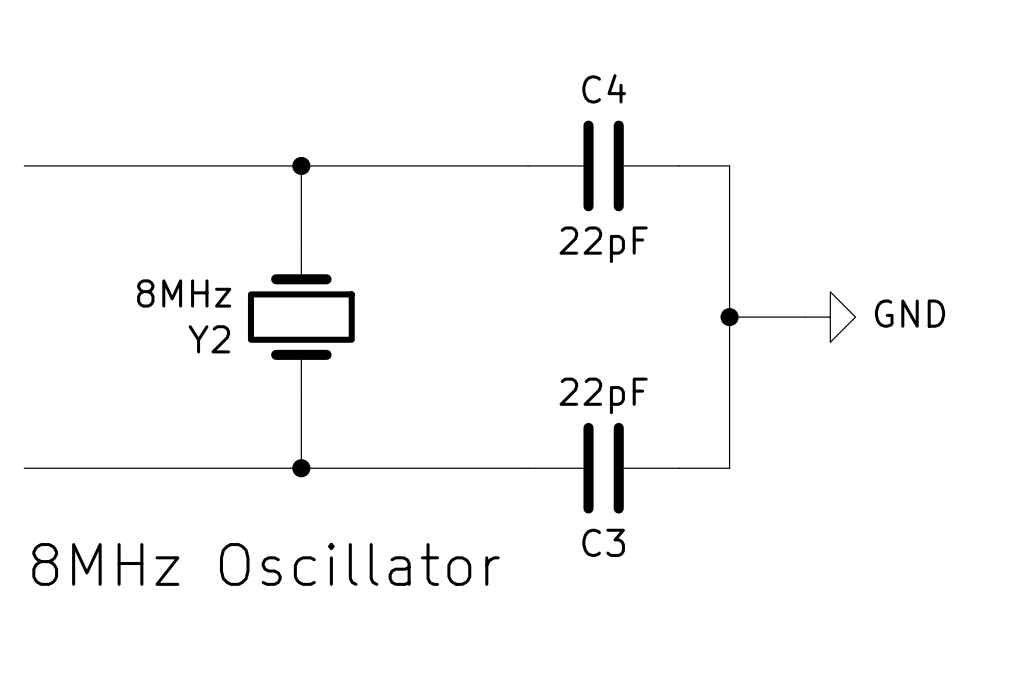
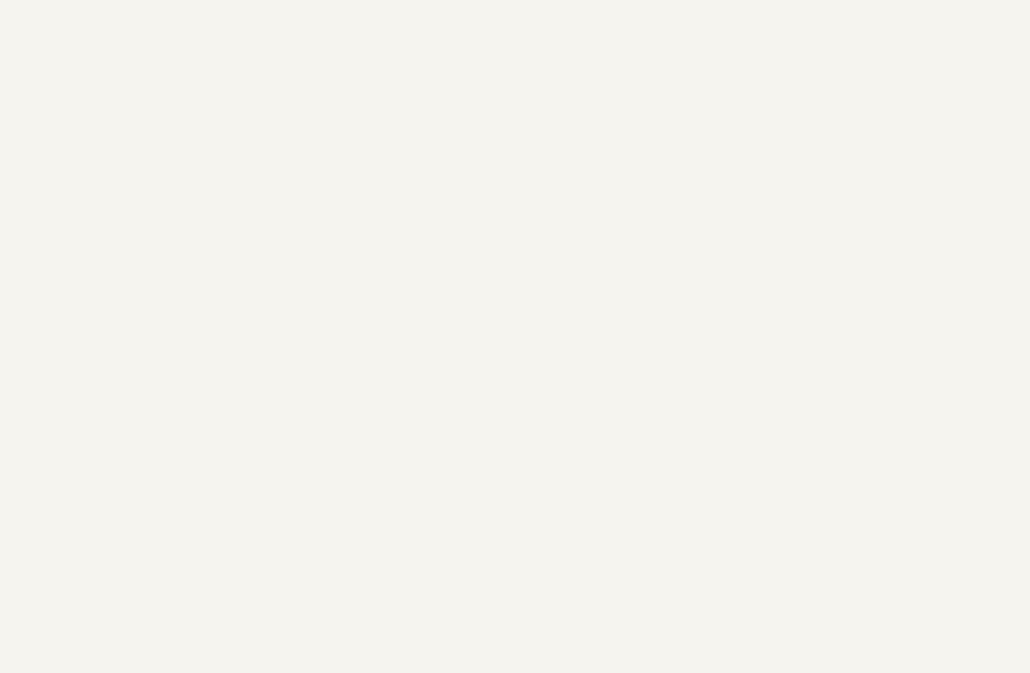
wire: (24, 165) (528, 165) -> none
wire: (301, 165) (301, 241) -> none
junction: (301, 165) -> none
C4: 22pF (603, 165) -> none
wire: (679, 165) (729, 165) (729, 468) (679, 468) -> none
Y2: 8MHz (301, 317) -> none
wire: (729, 317) (805, 317) -> none
junction: (729, 317) -> none
power symbol: GND (830, 317) -> none
wire: (301, 392) (301, 468) -> none
wire: (24, 468) (528, 468) -> none
junction: (301, 468) -> none
C3: 22pF (603, 468) -> none
text: 8MHz Oscillator (265, 564) -> none

